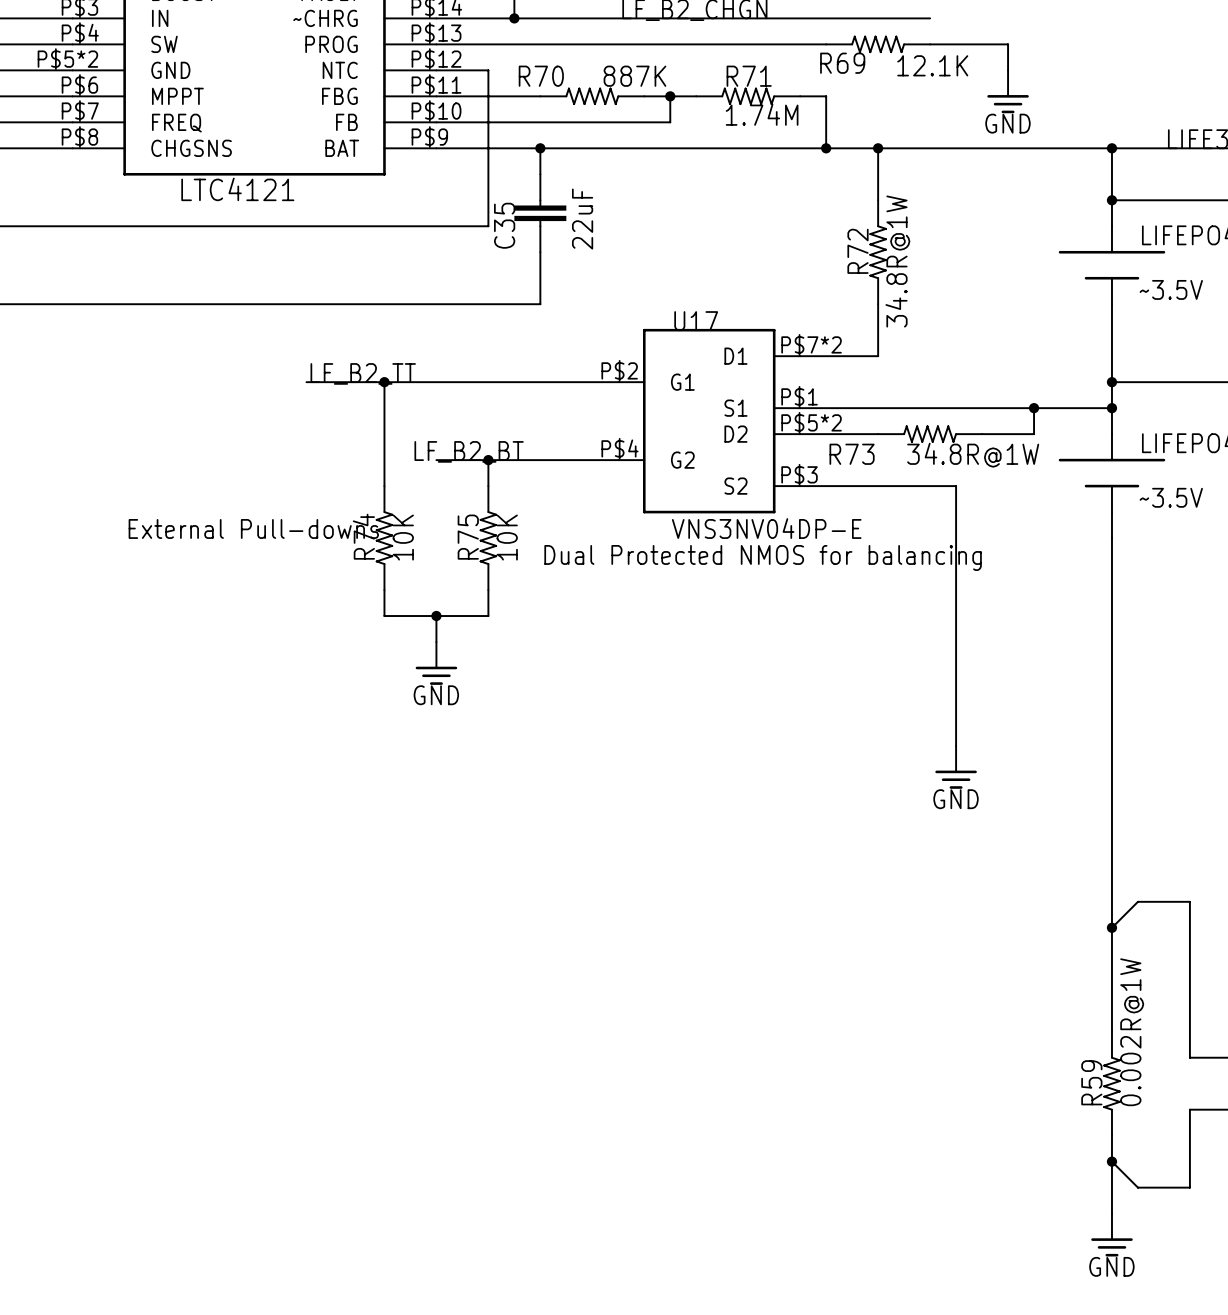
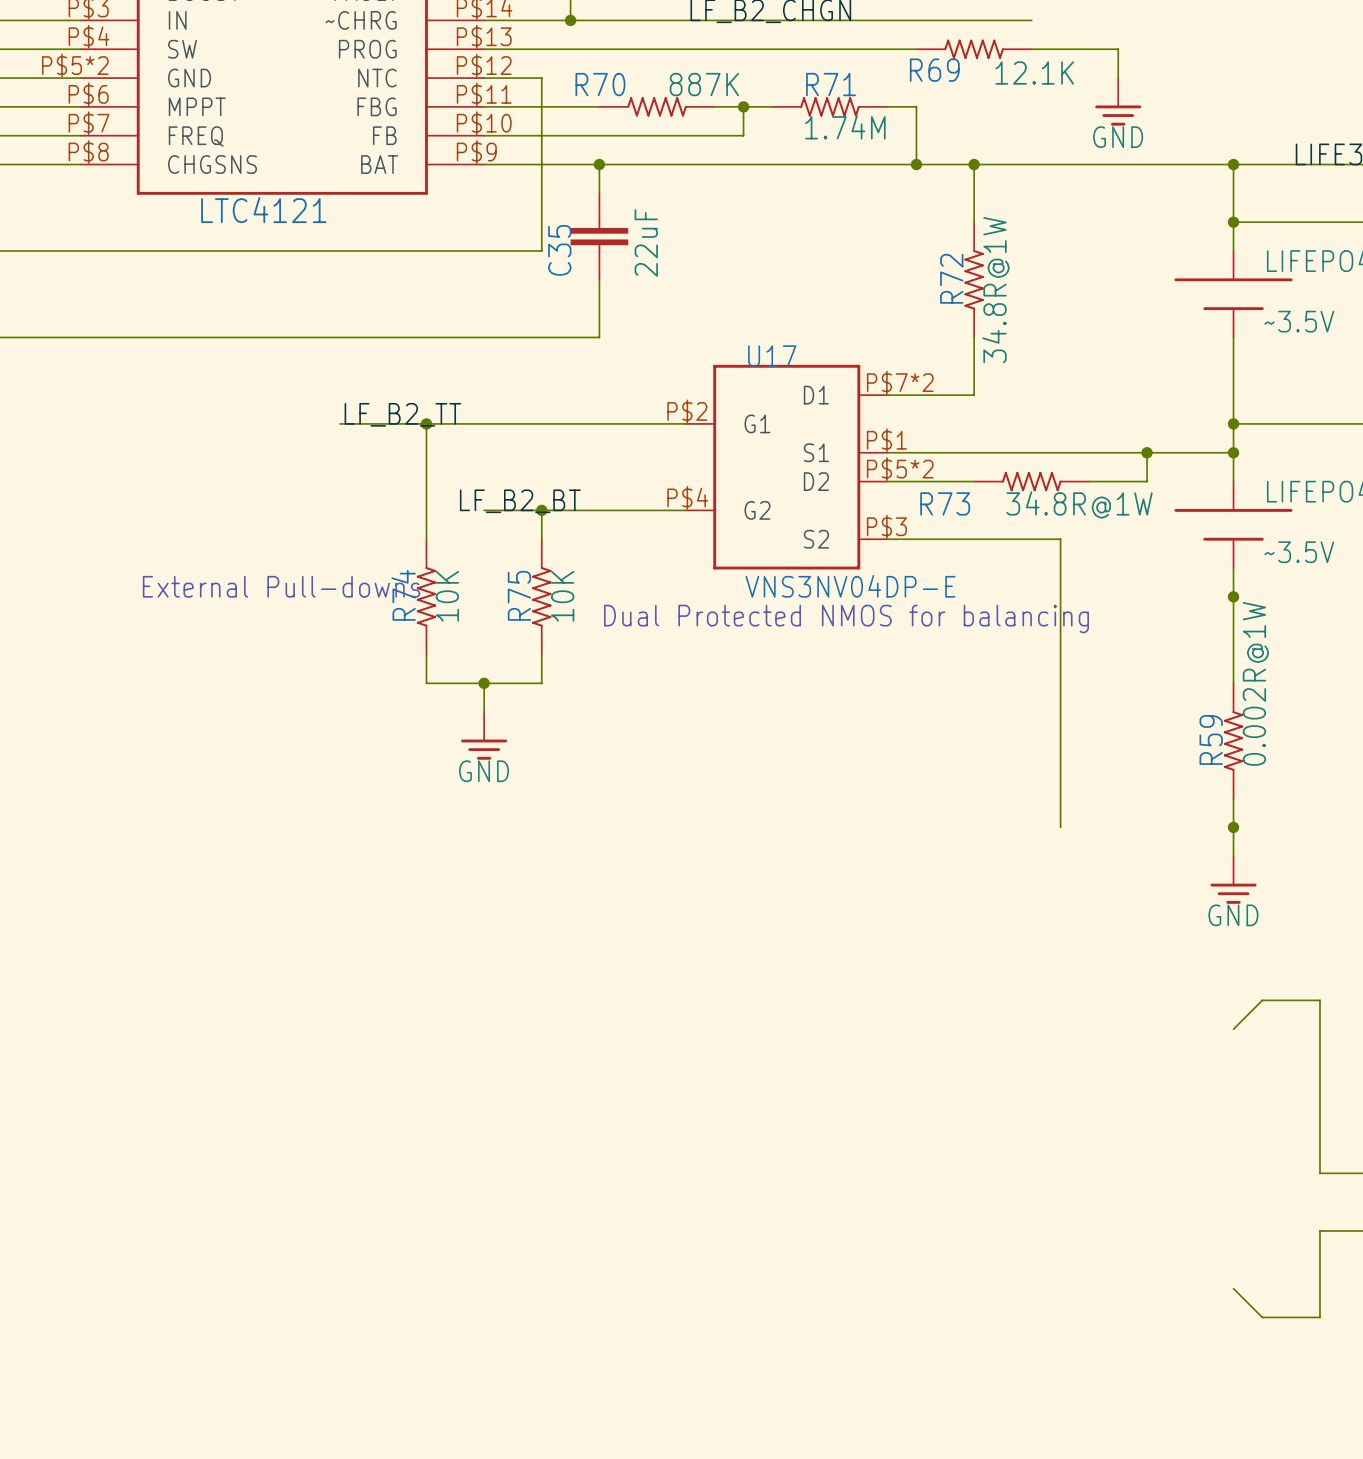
junction: none -> (1233, 596)
junction: none -> (1233, 827)
power symbol: GND (956, 767) -> none
wire: (1111, 771) (1111, 1031) -> none
power symbol: none -> GND (1233, 880)
junction: (1111, 927) -> none
R59 position: (1111, 1083) -> (1233, 740)
wire: (1111, 1135) (1111, 1213) -> none
junction: (1111, 1161) -> none
power symbol: GND (1111, 1235) -> none

